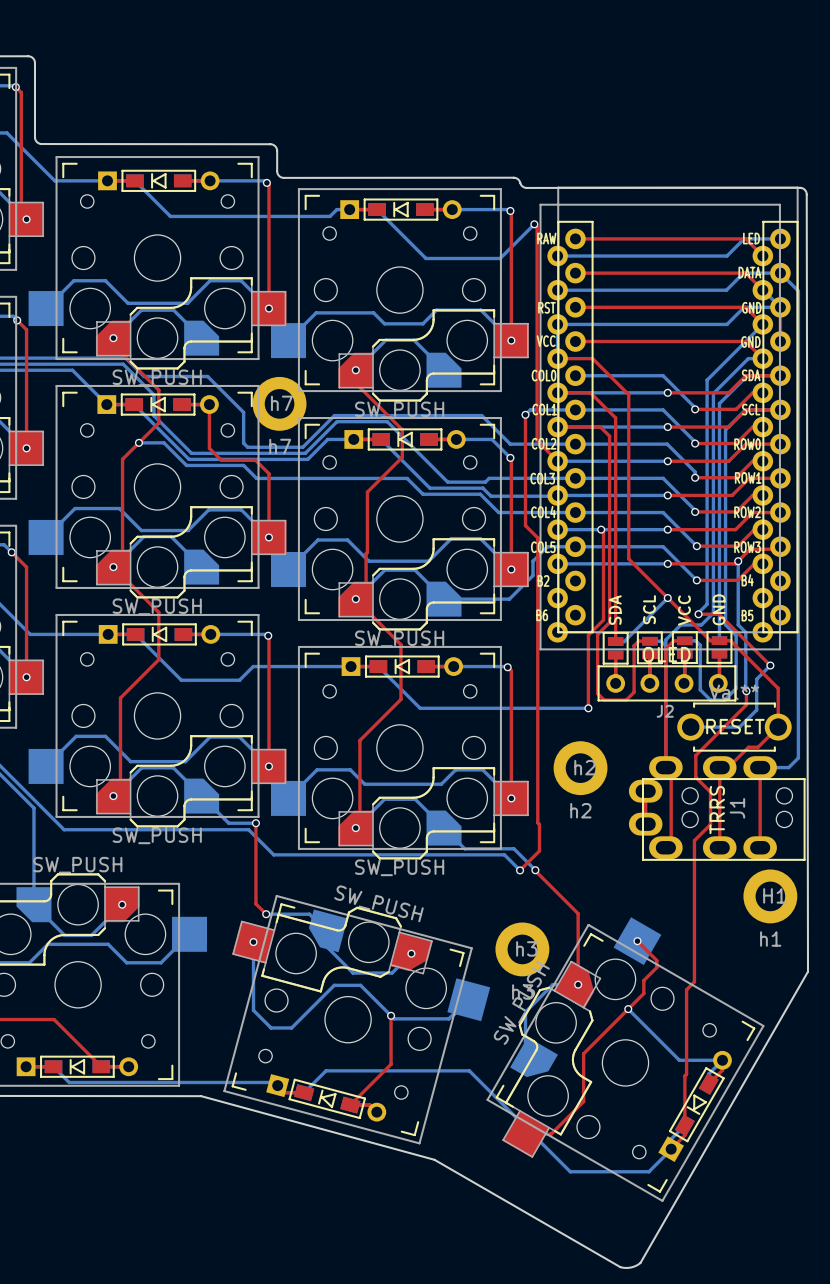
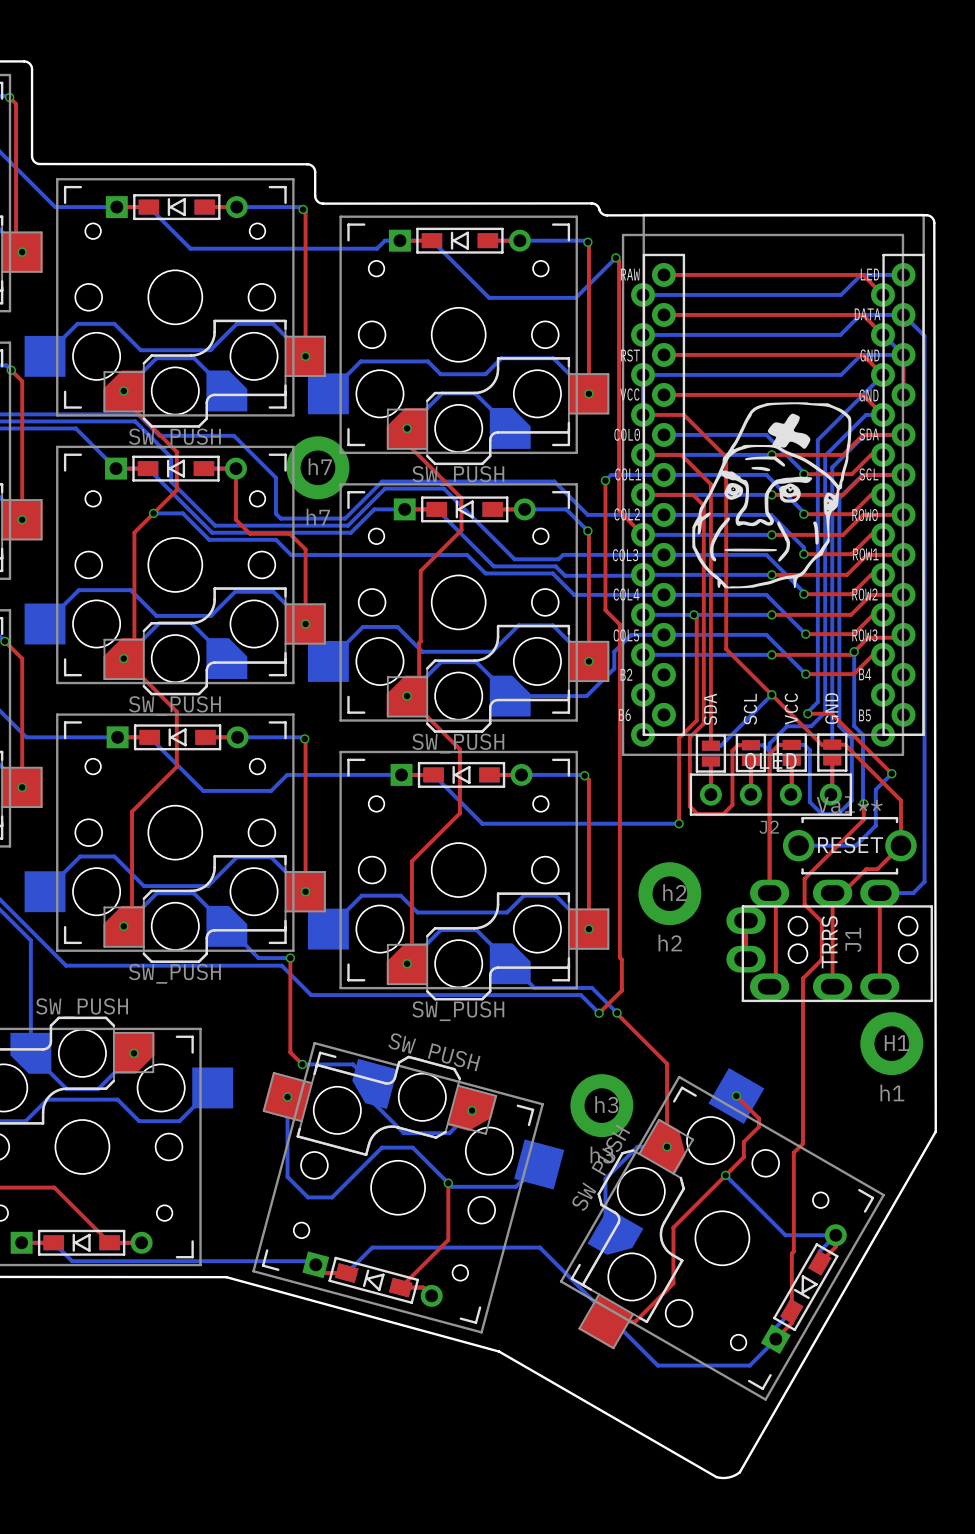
drawing: none -> [692, 402, 852, 589]

